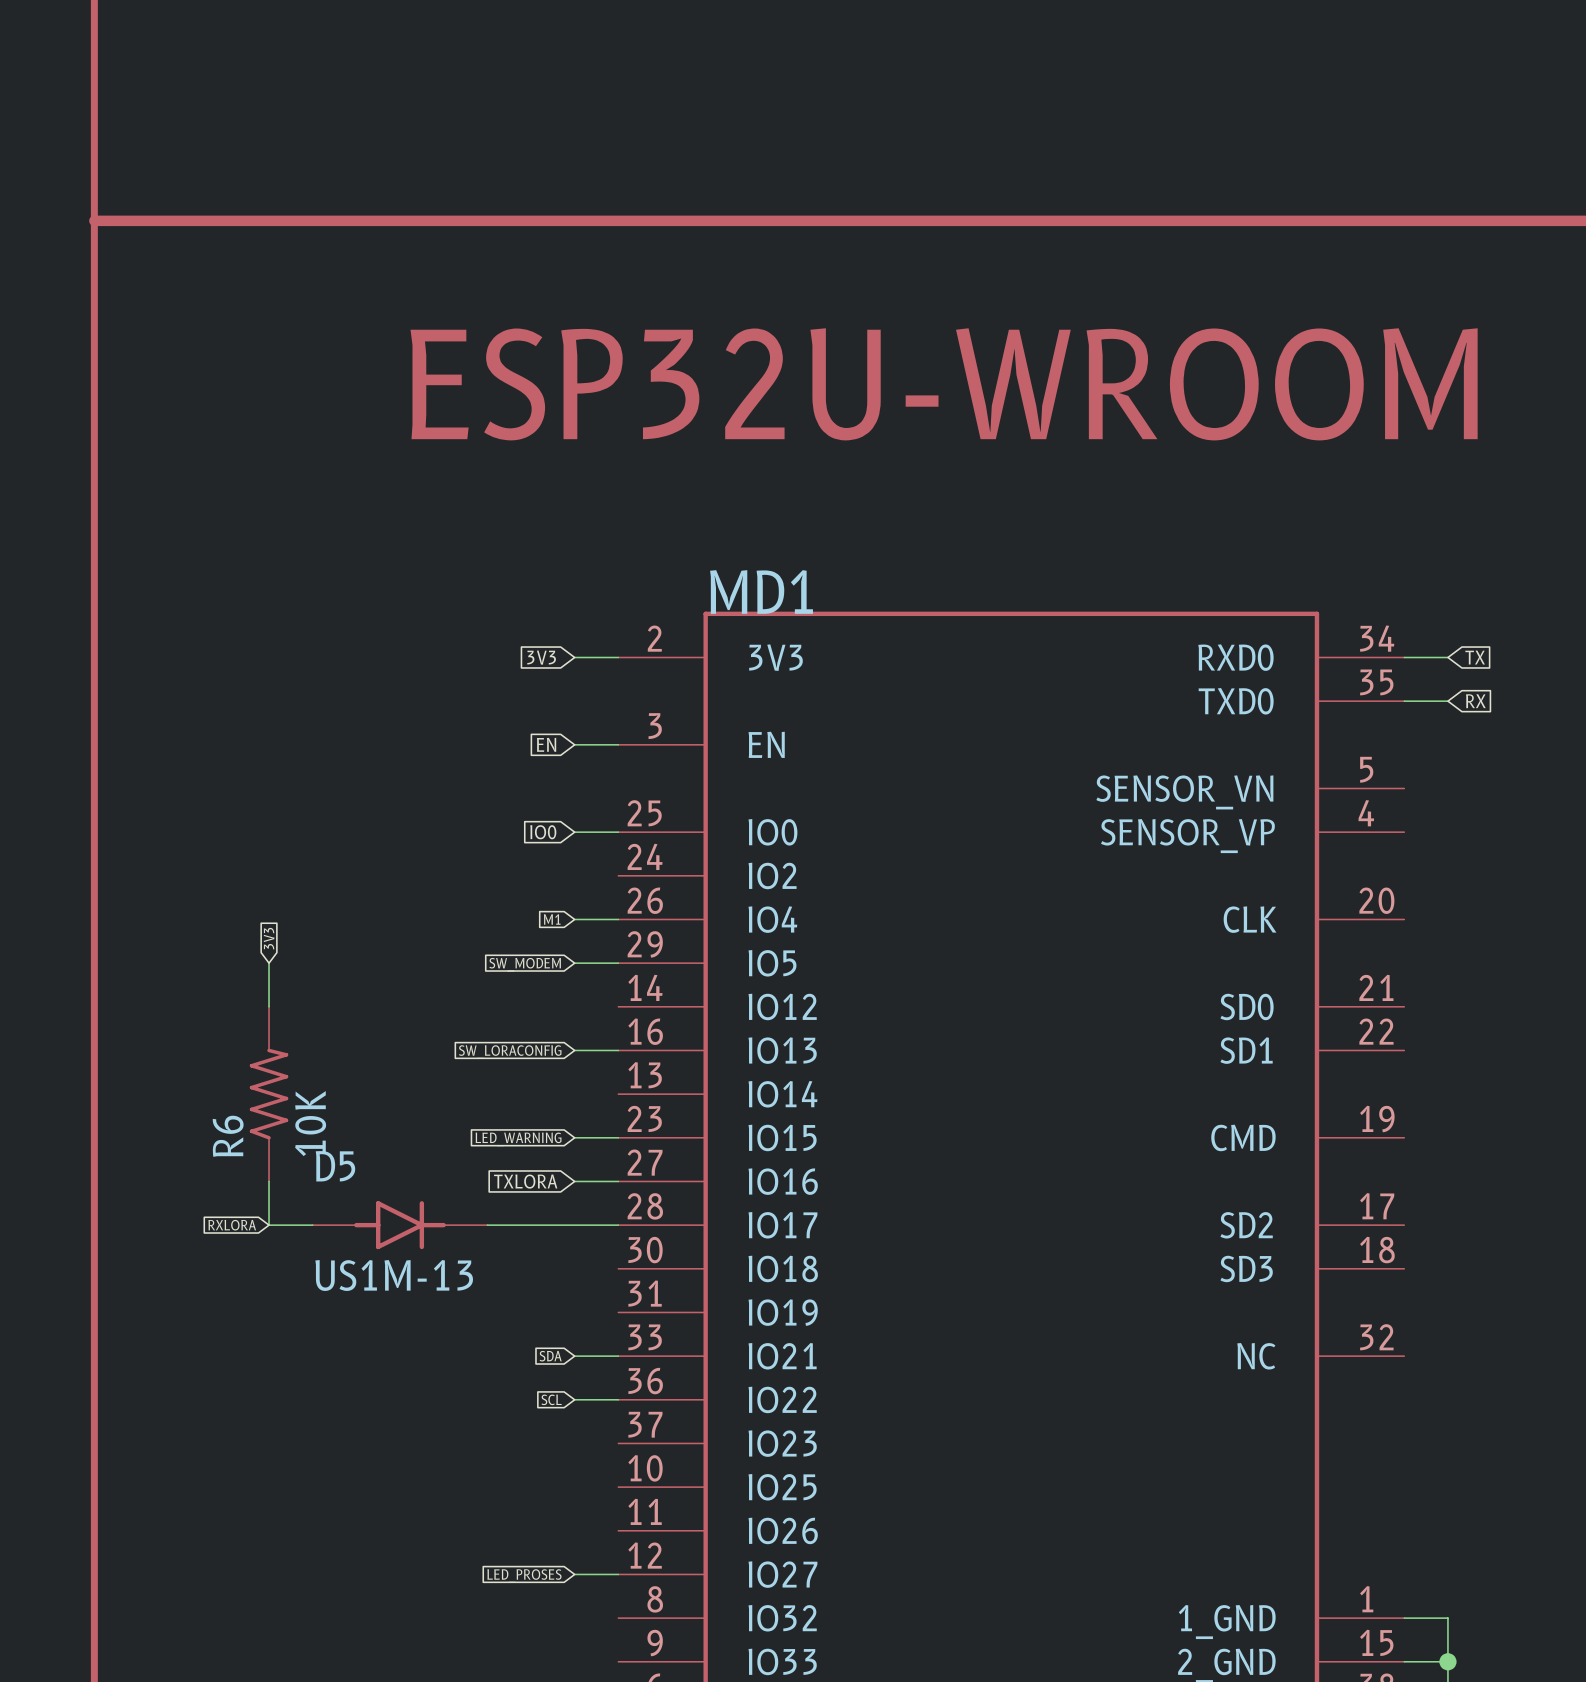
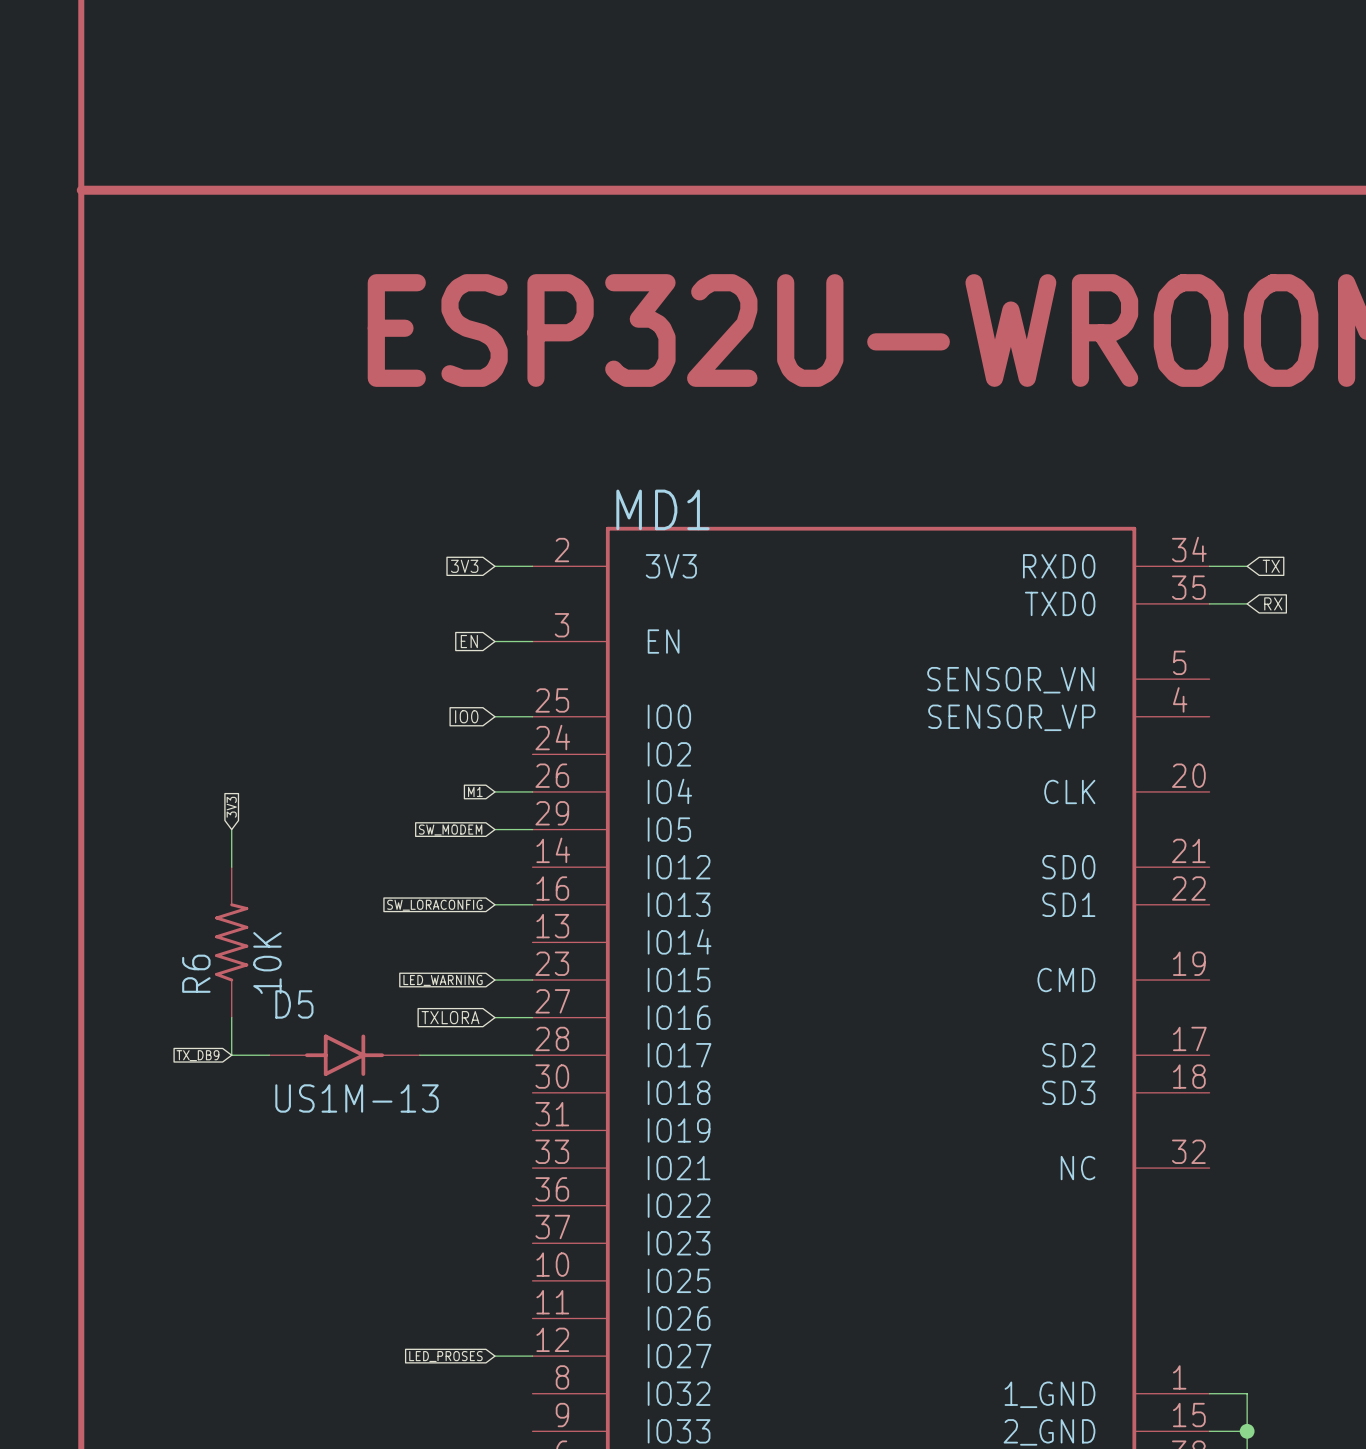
global label: RXLORA (232, 1225) -> TX_DB9 (197, 1055)
global label: SDA (550, 1356) -> none
wire: (574, 1356) (618, 1356) -> none
global label: SCL (551, 1399) -> none
wire: (574, 1399) (618, 1399) -> none

